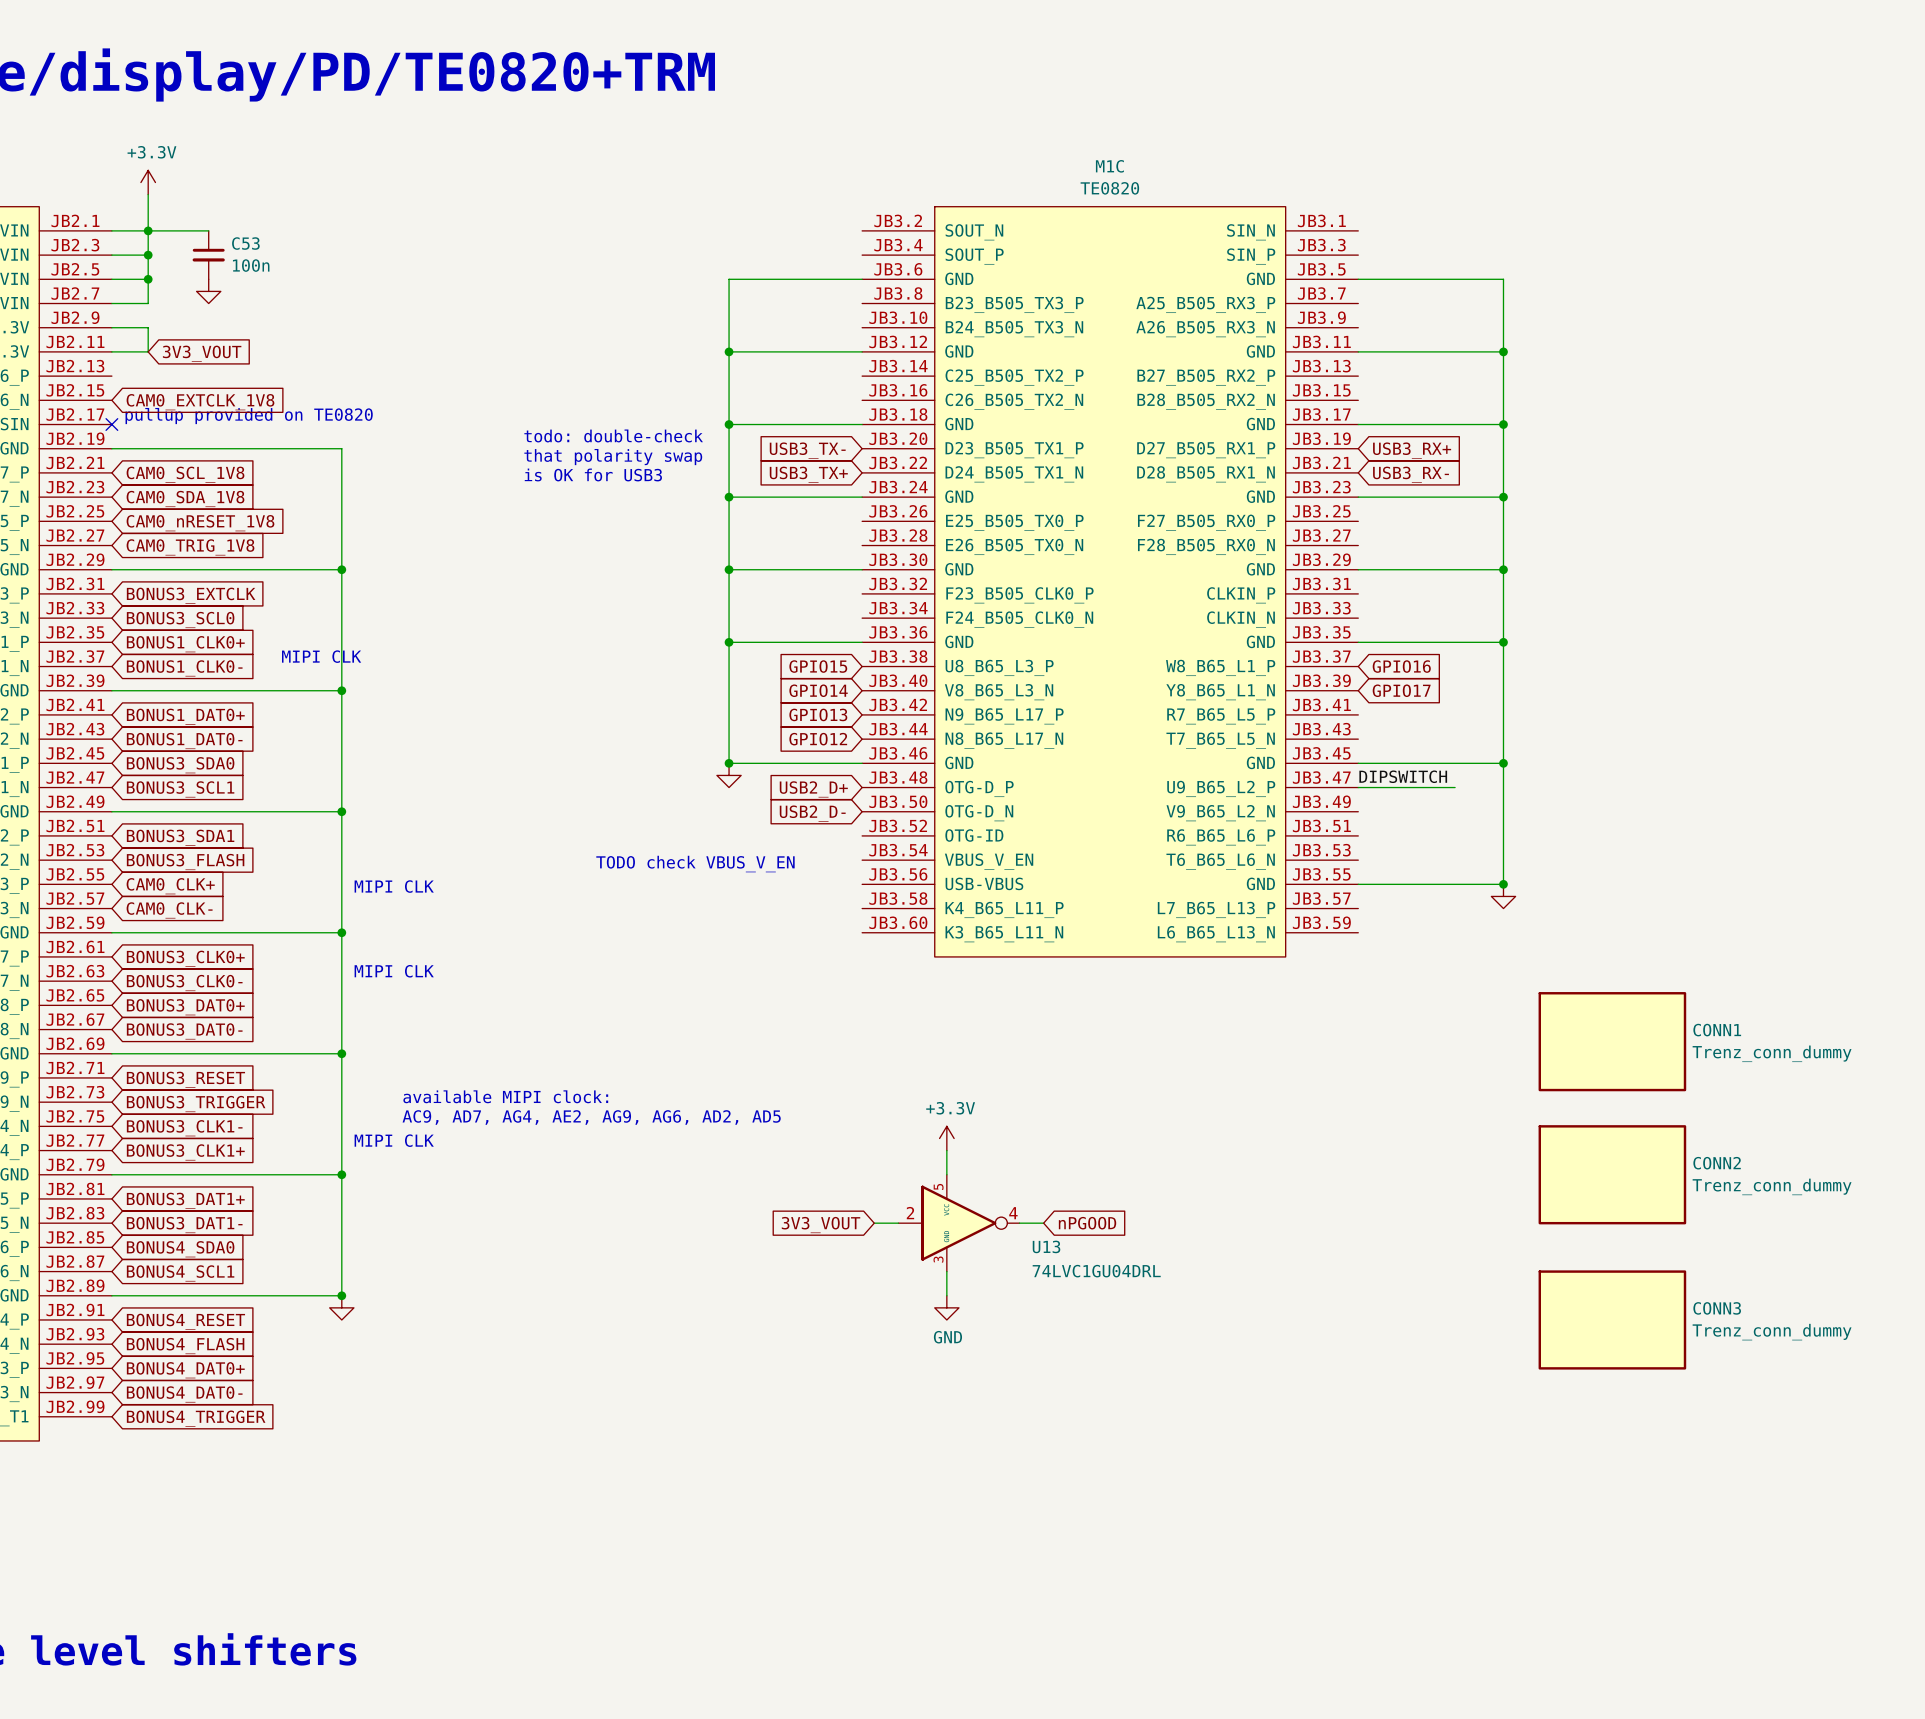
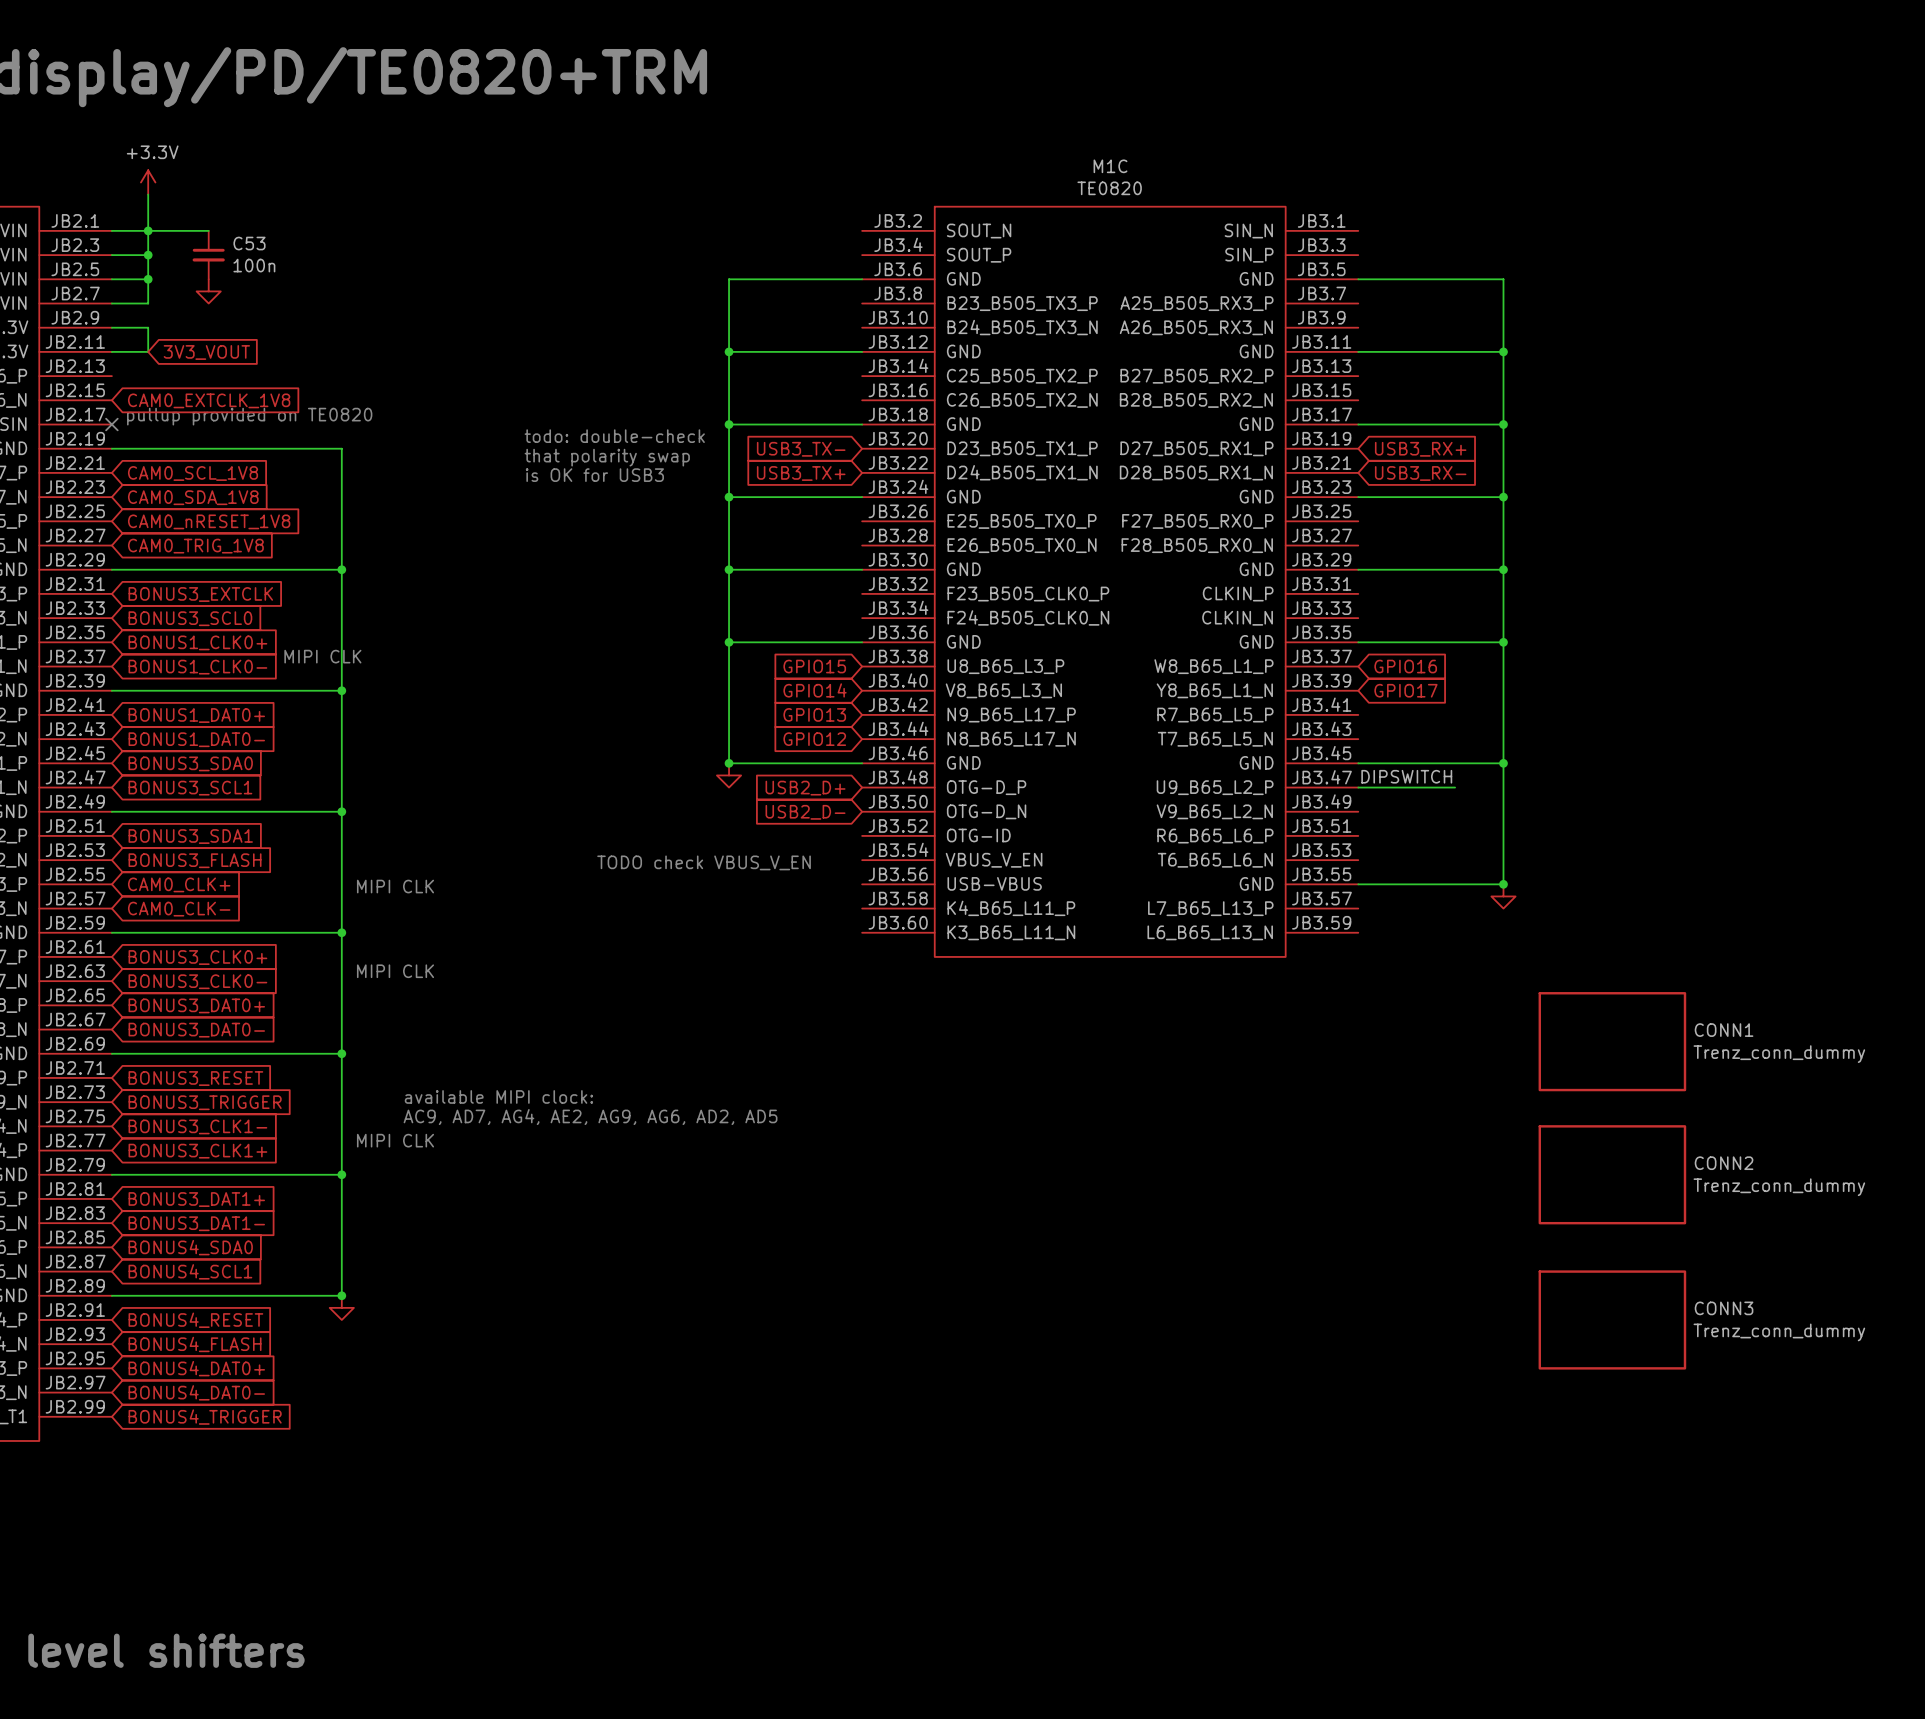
power symbol: +3.3V (946, 1138) -> none
wire: (946, 1150) (946, 1174) -> none
wire: (874, 1223) (898, 1223) -> none
U13: 74LVC1GU04DRL (958, 1223) -> none
wire: (1019, 1223) (1043, 1223) -> none
global label: nPGOOD (1087, 1223) -> none
global label: 3V3_VOUT (821, 1225) -> none
wire: (946, 1271) (946, 1295) -> none
power symbol: GND (946, 1307) -> none

